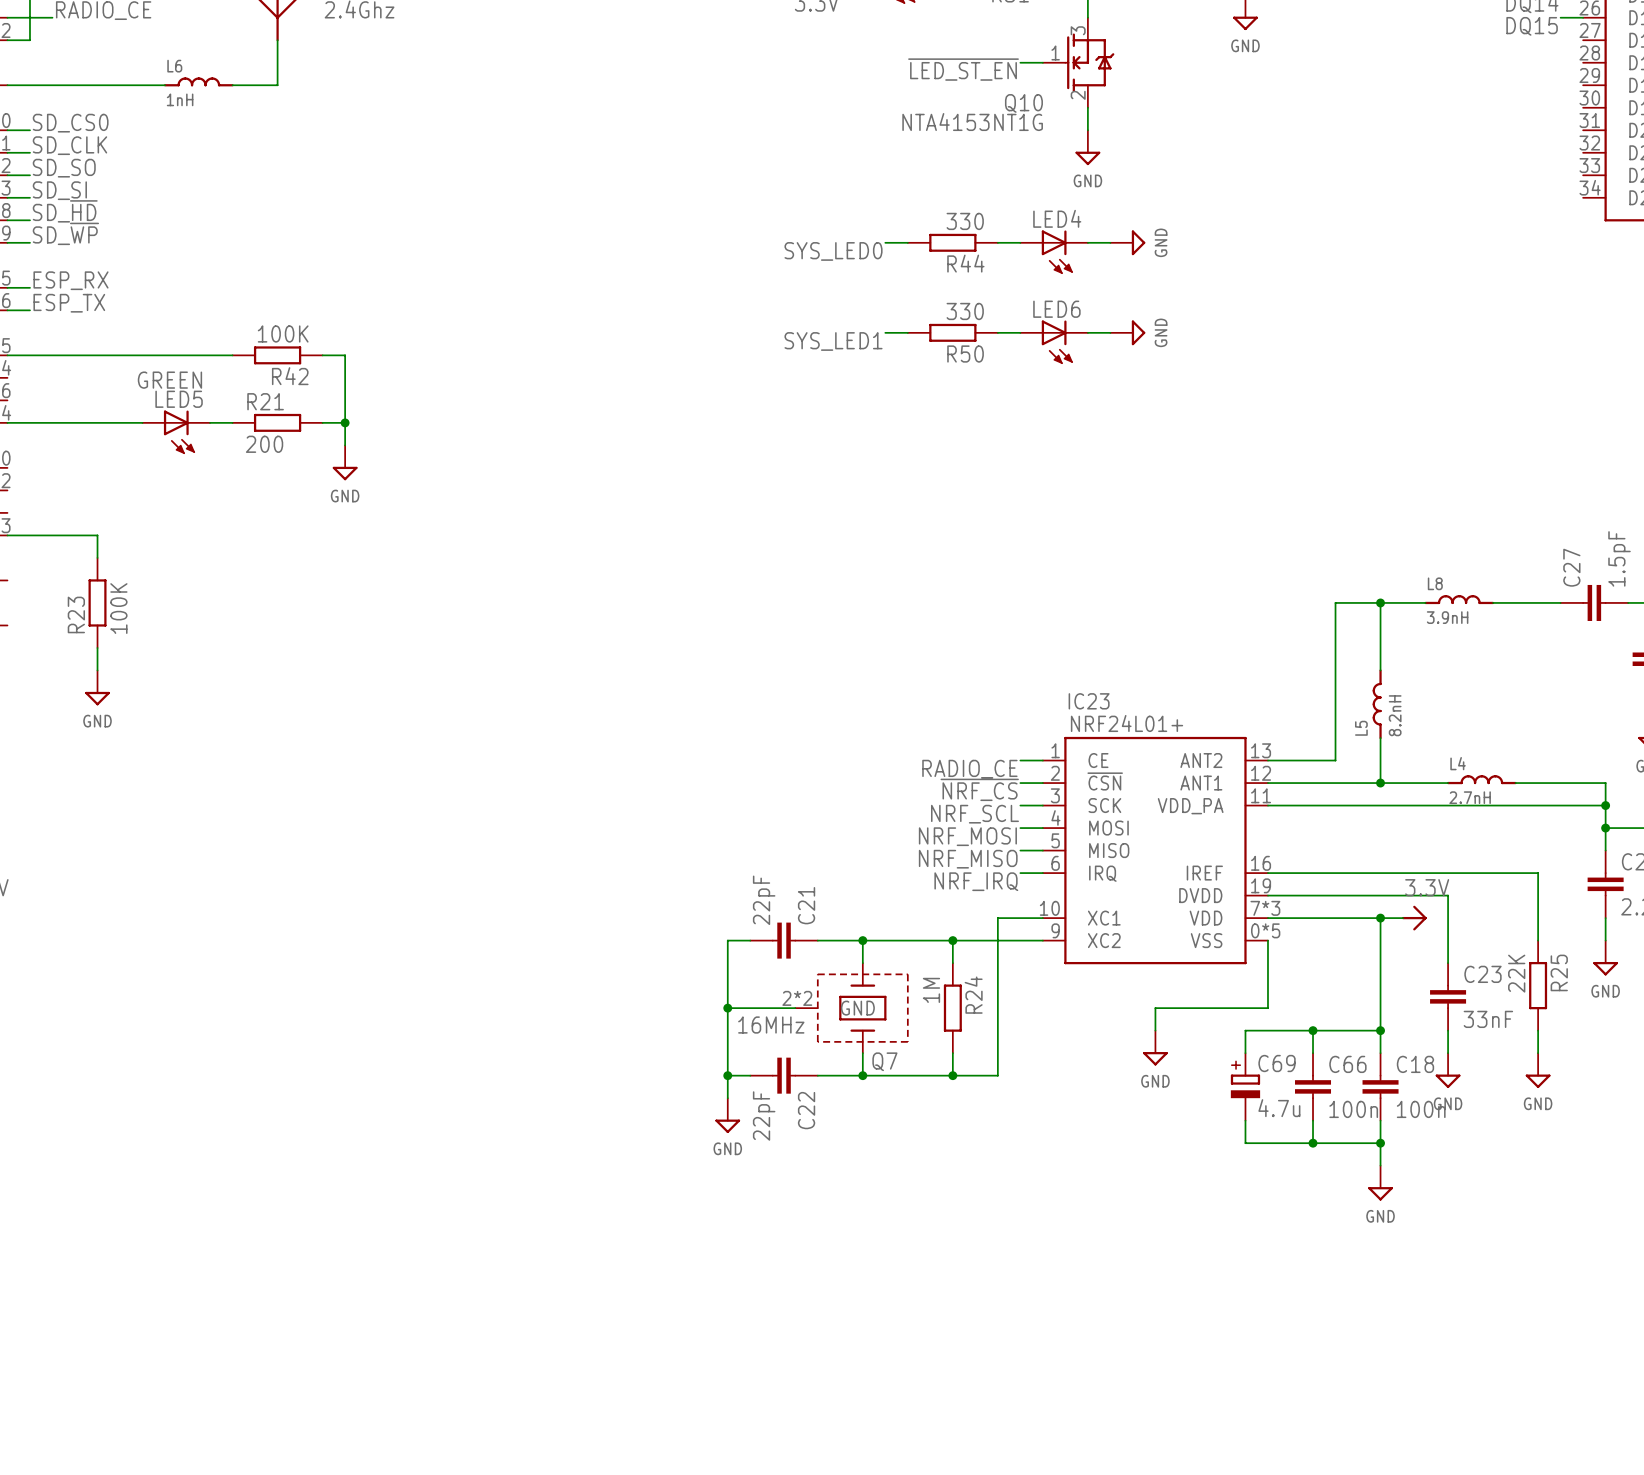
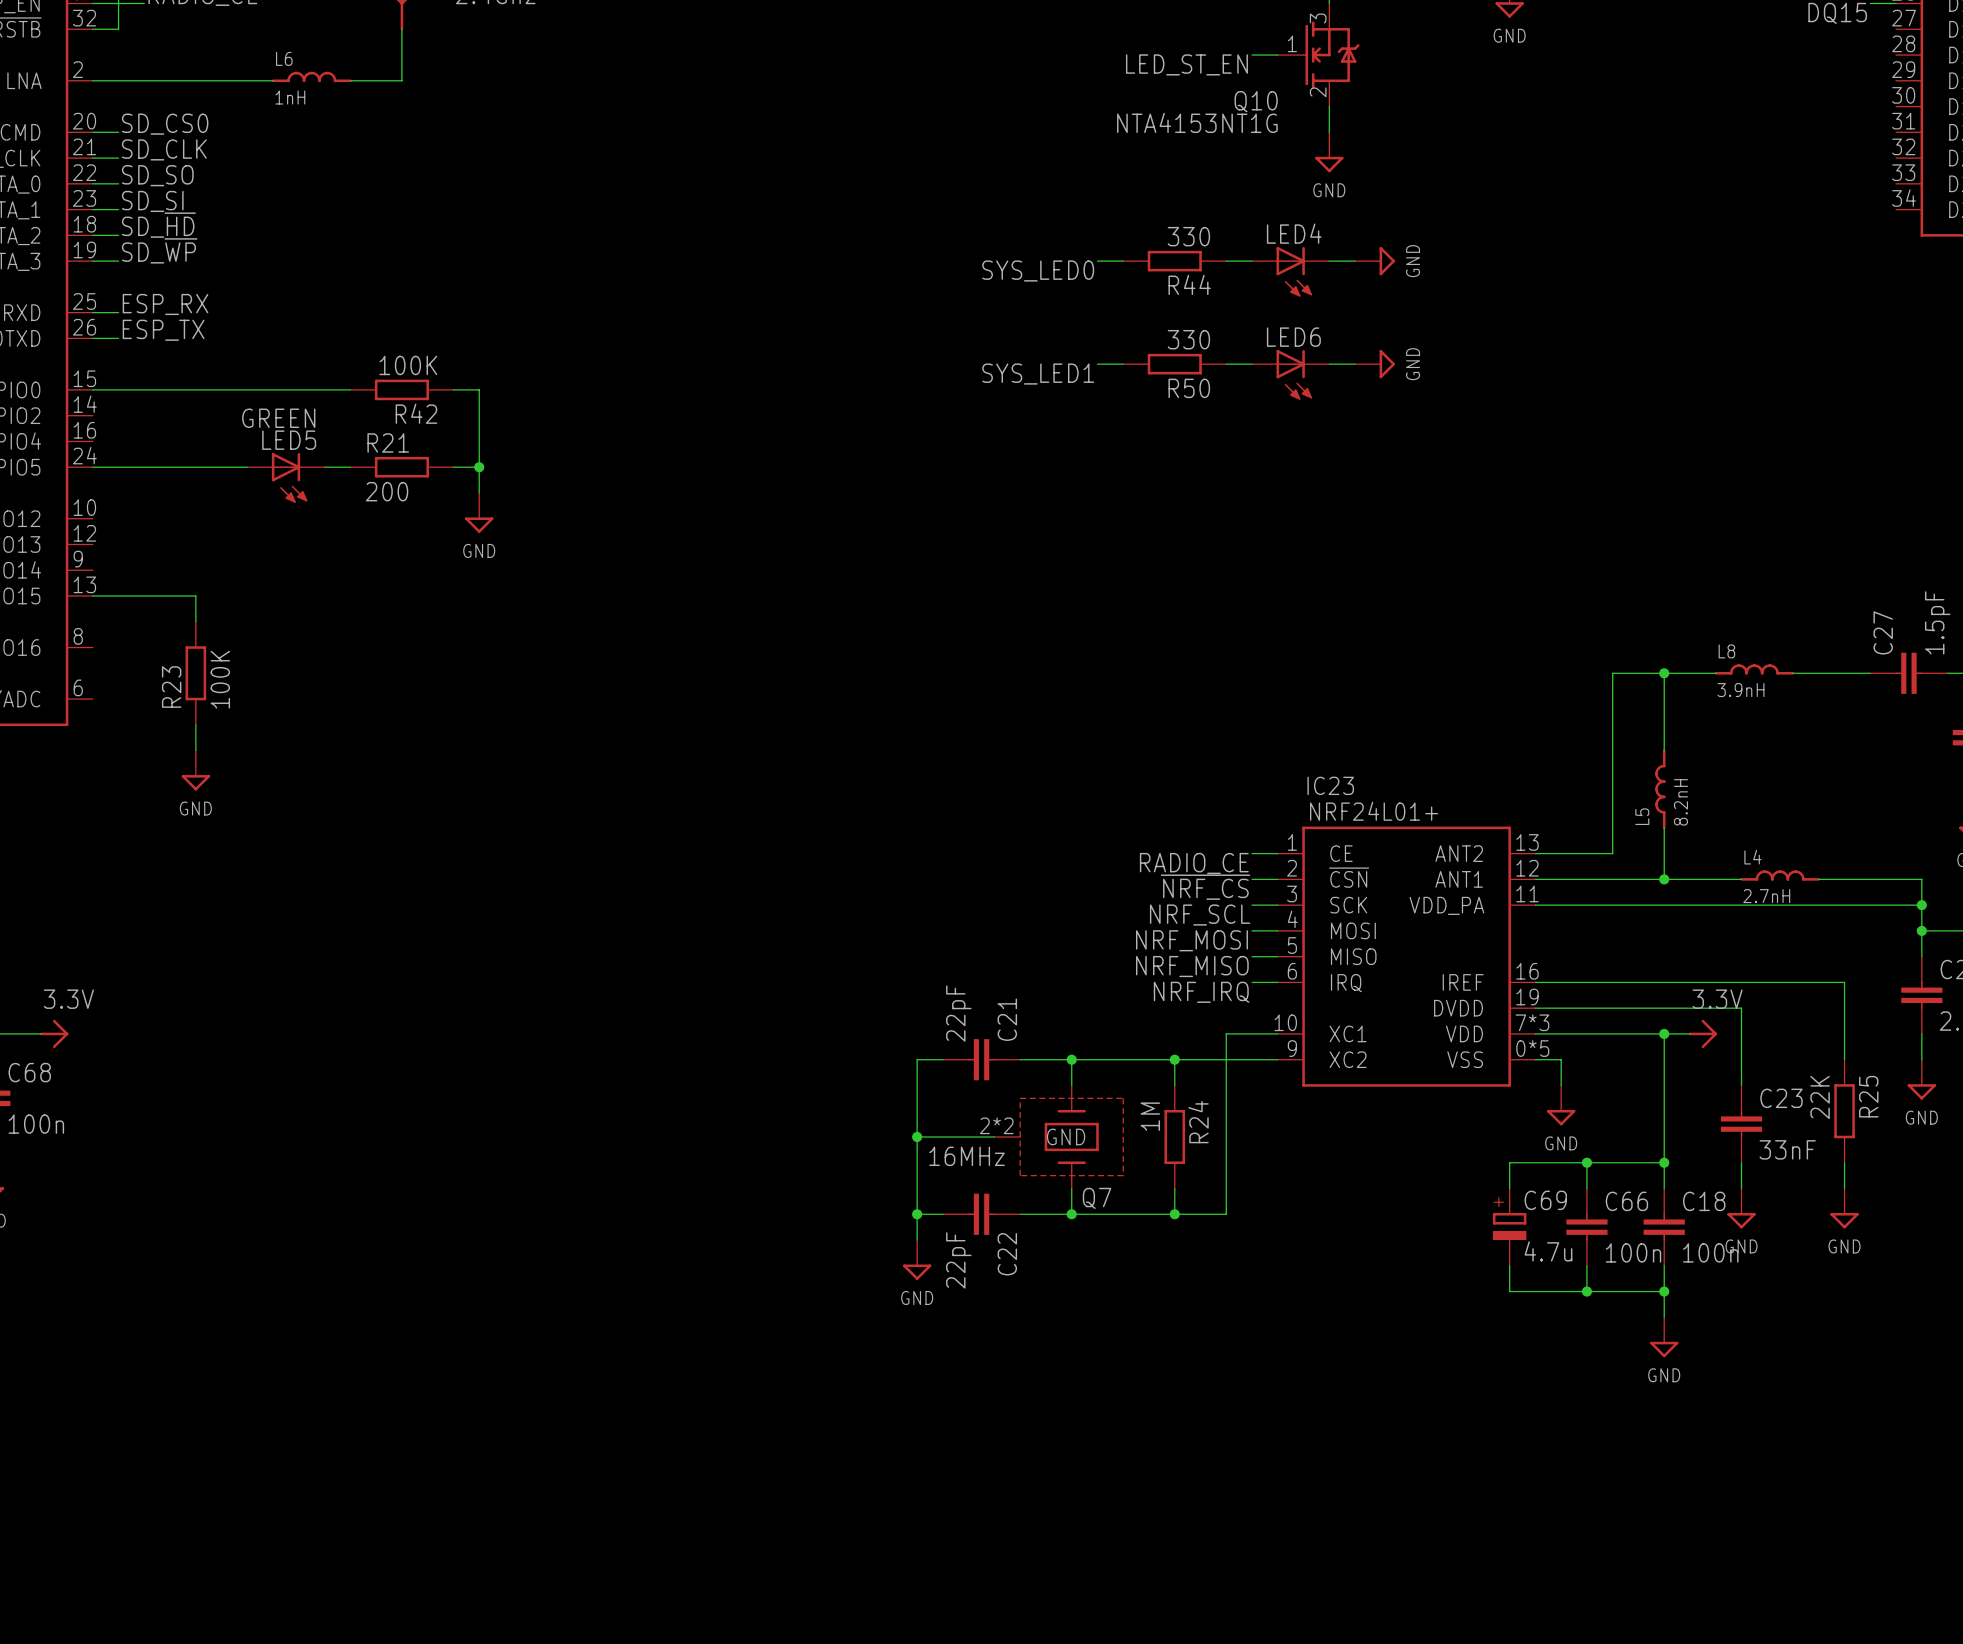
label: ~{LED_ST_EN} (963, 69) -> LED_ST_EN (1186, 64)
wire: (1267, 940) (1267, 1008) (1155, 1008) (1155, 1030) -> (1535, 1059) (1561, 1059) (1561, 1085)
power symbol position: GND (1155, 1048) -> GND (1561, 1105)

